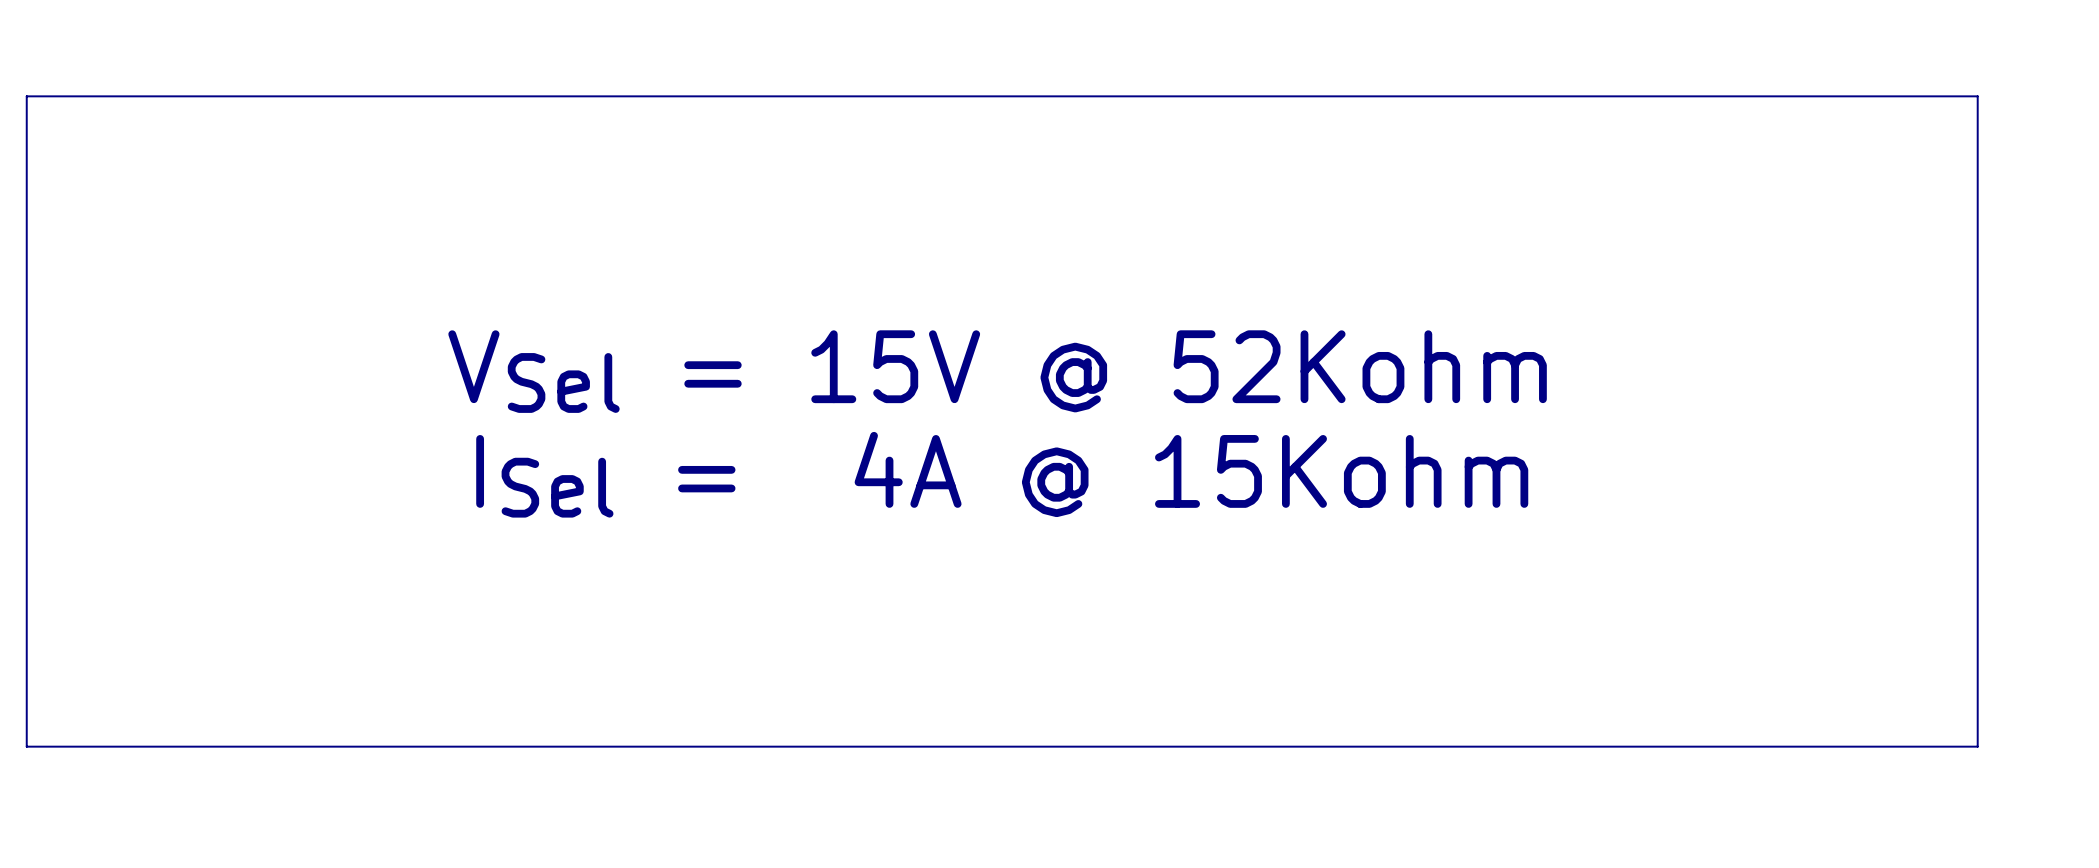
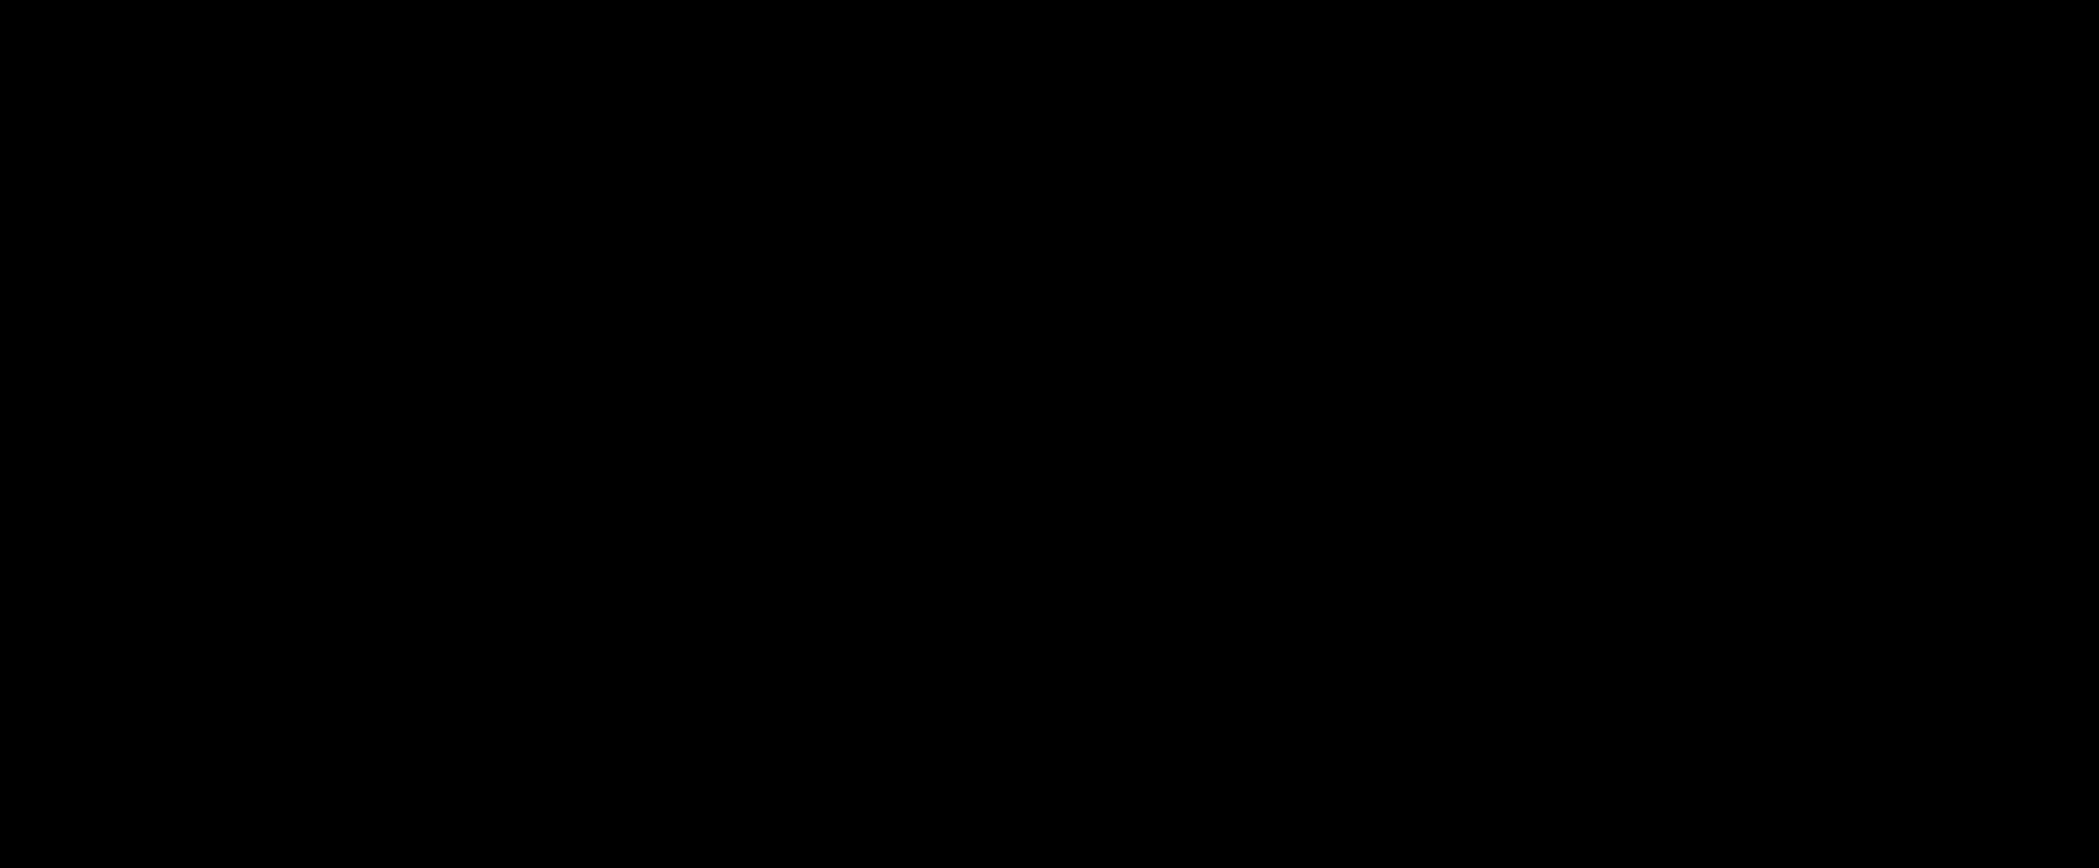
line: (26, 96) (1977, 96) (1977, 746) (26, 746) (26, 96) -> none
text: VSel = 15V @ 52Kohm (997, 371) -> none
text: ISel = 4A @ 15Kohm (1002, 474) -> none

